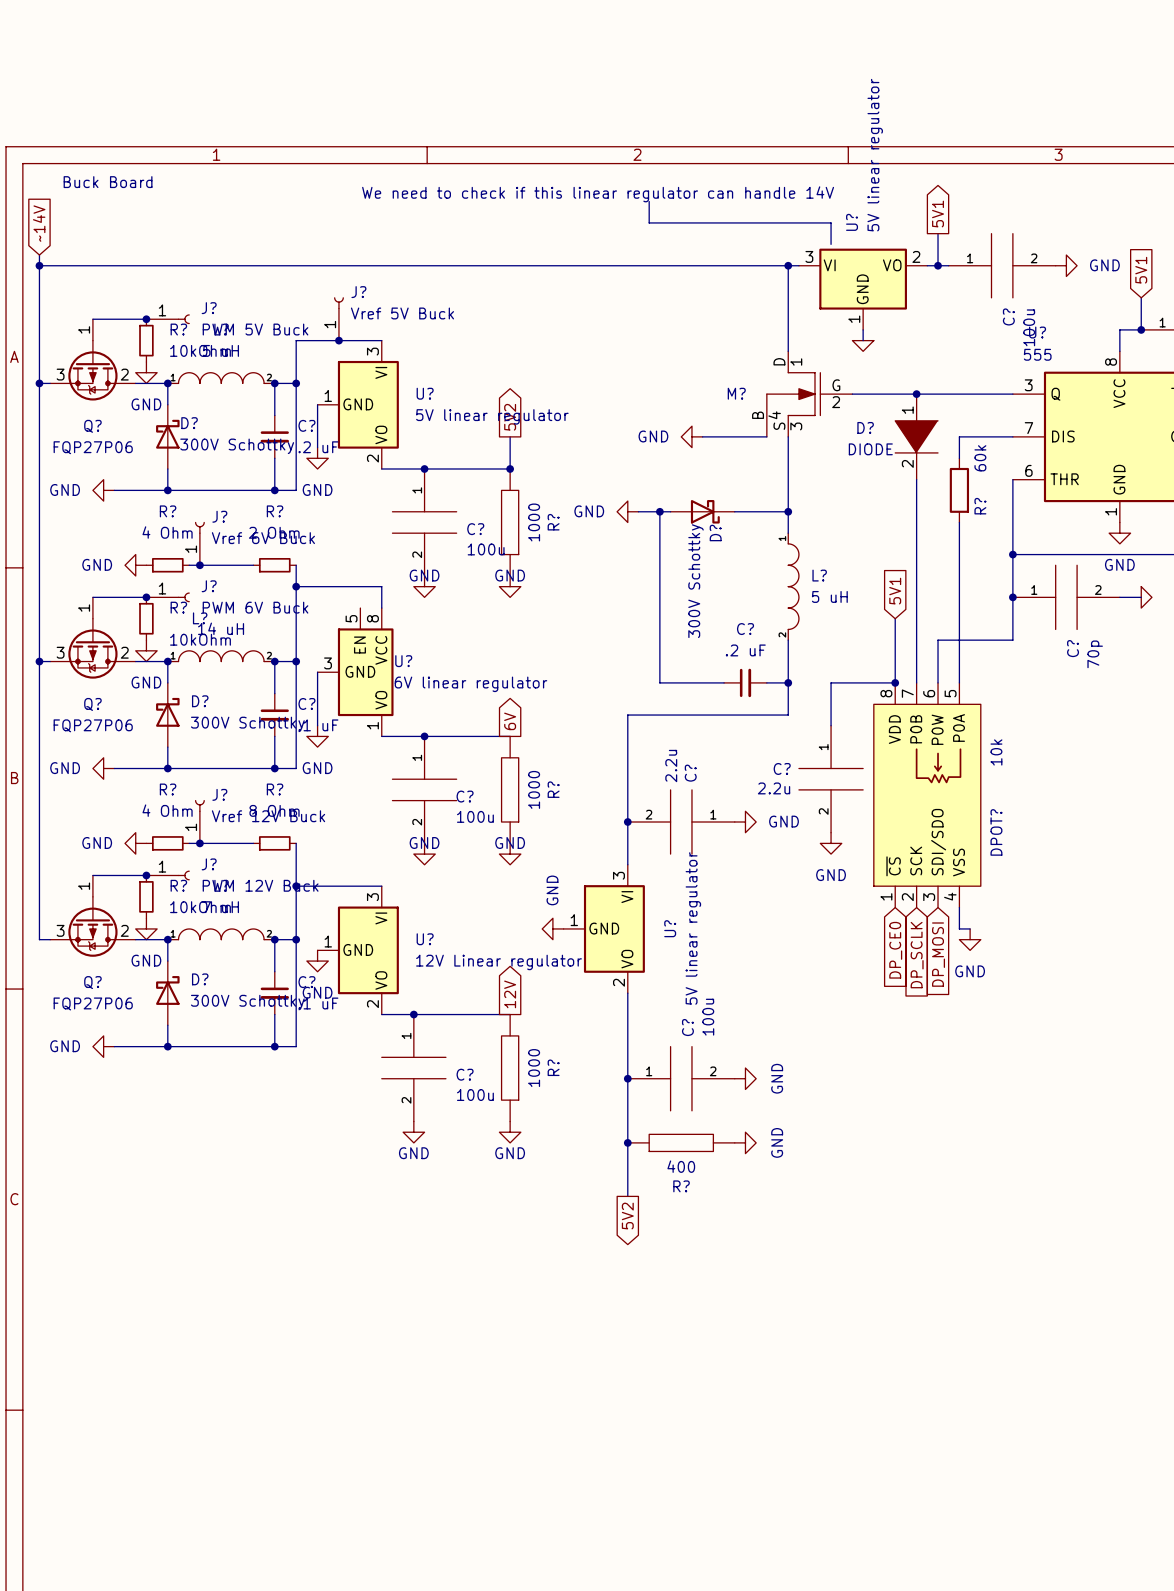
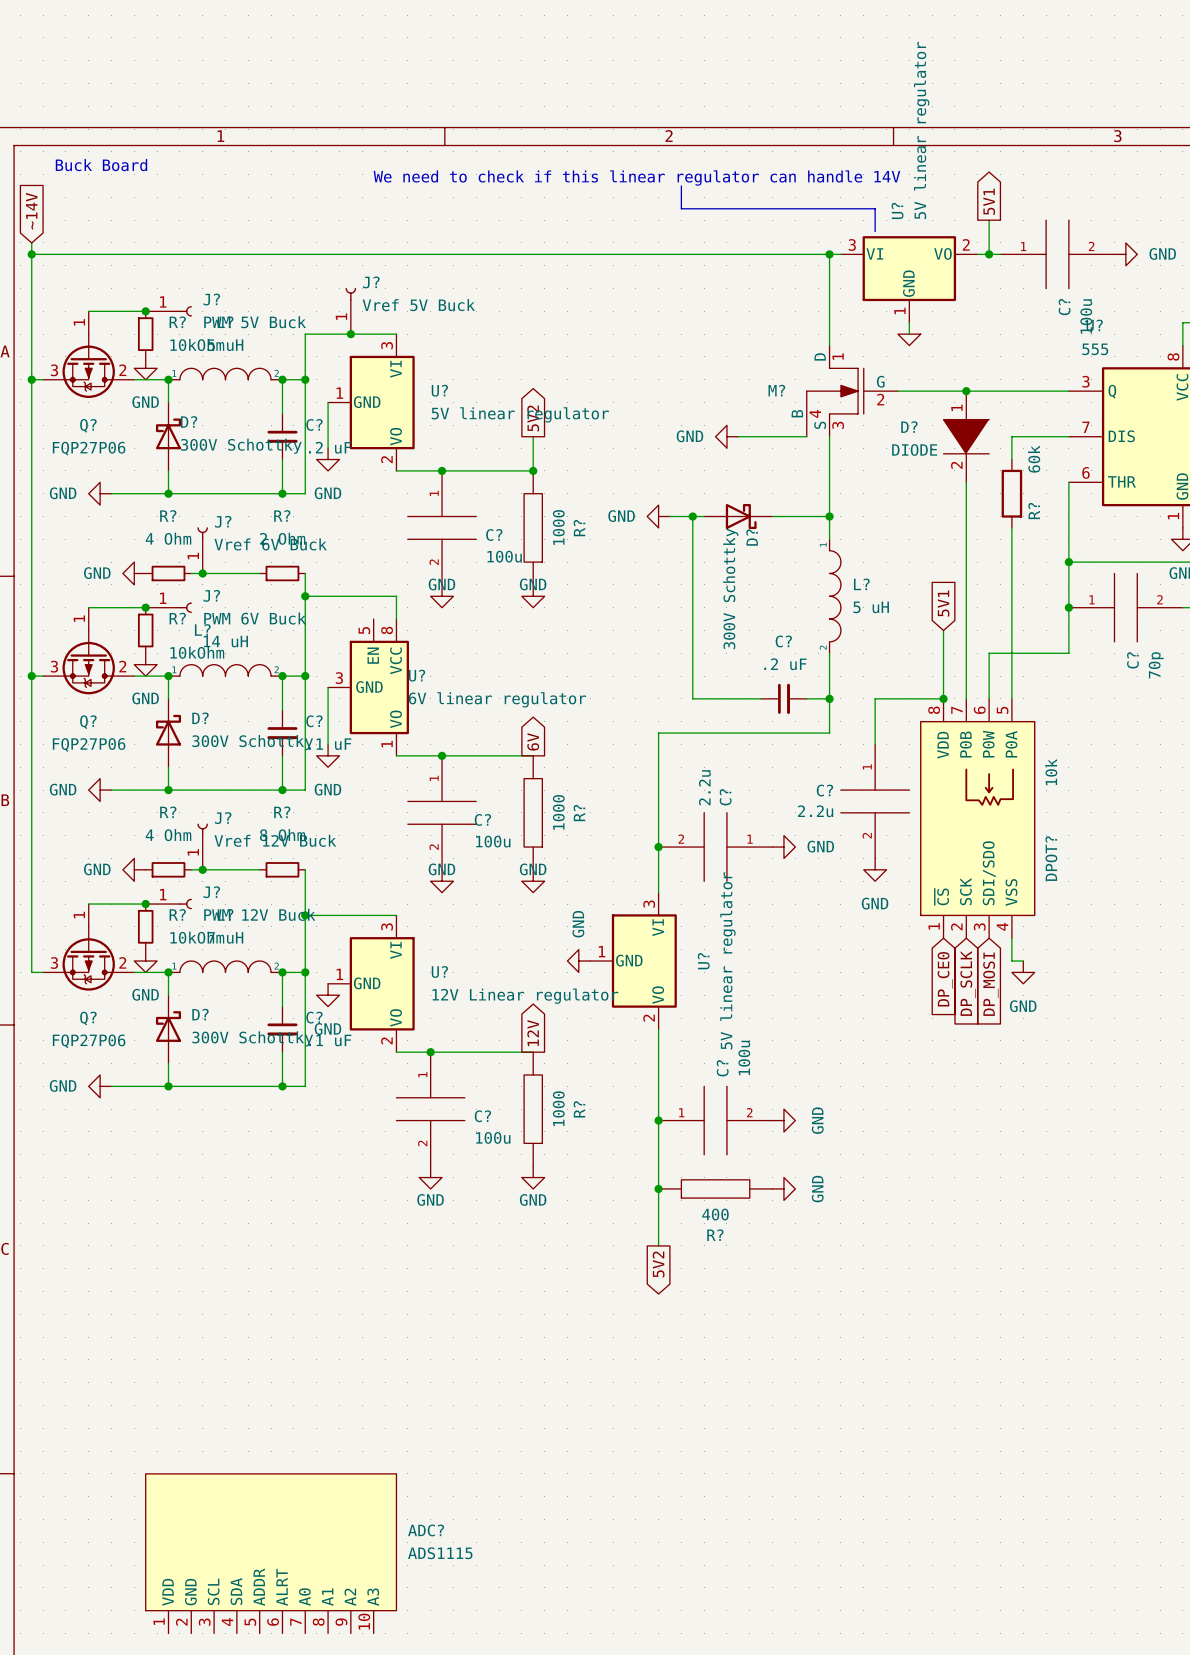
ADC?: none -> ADS1115 (271, 1553)

